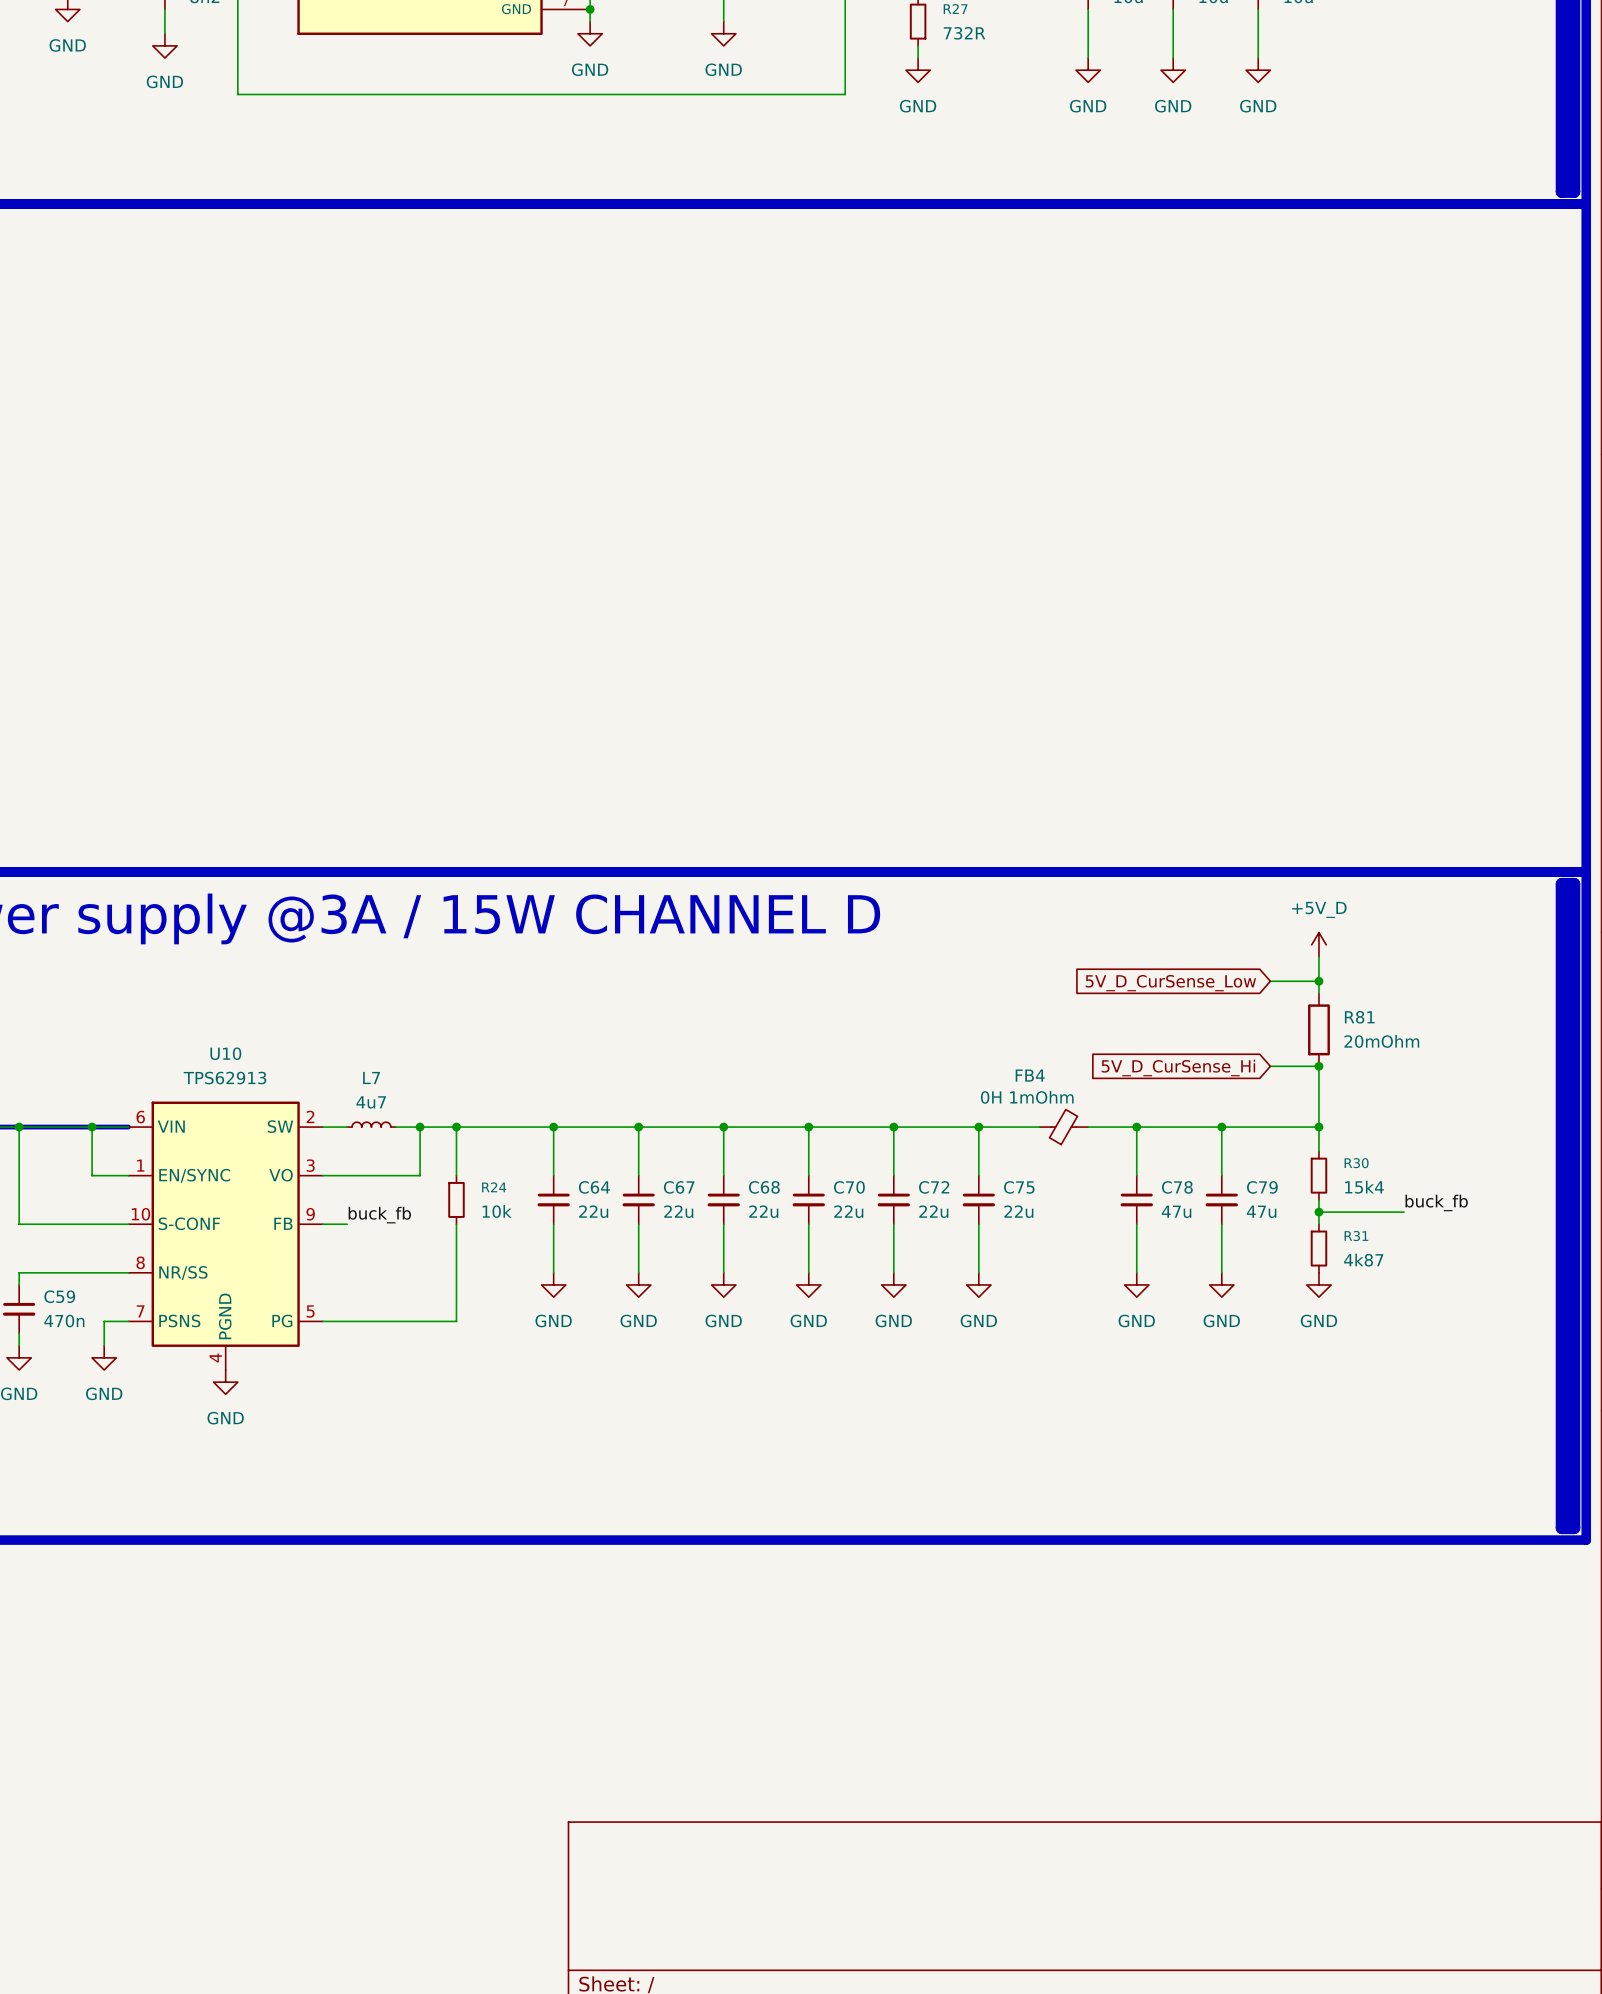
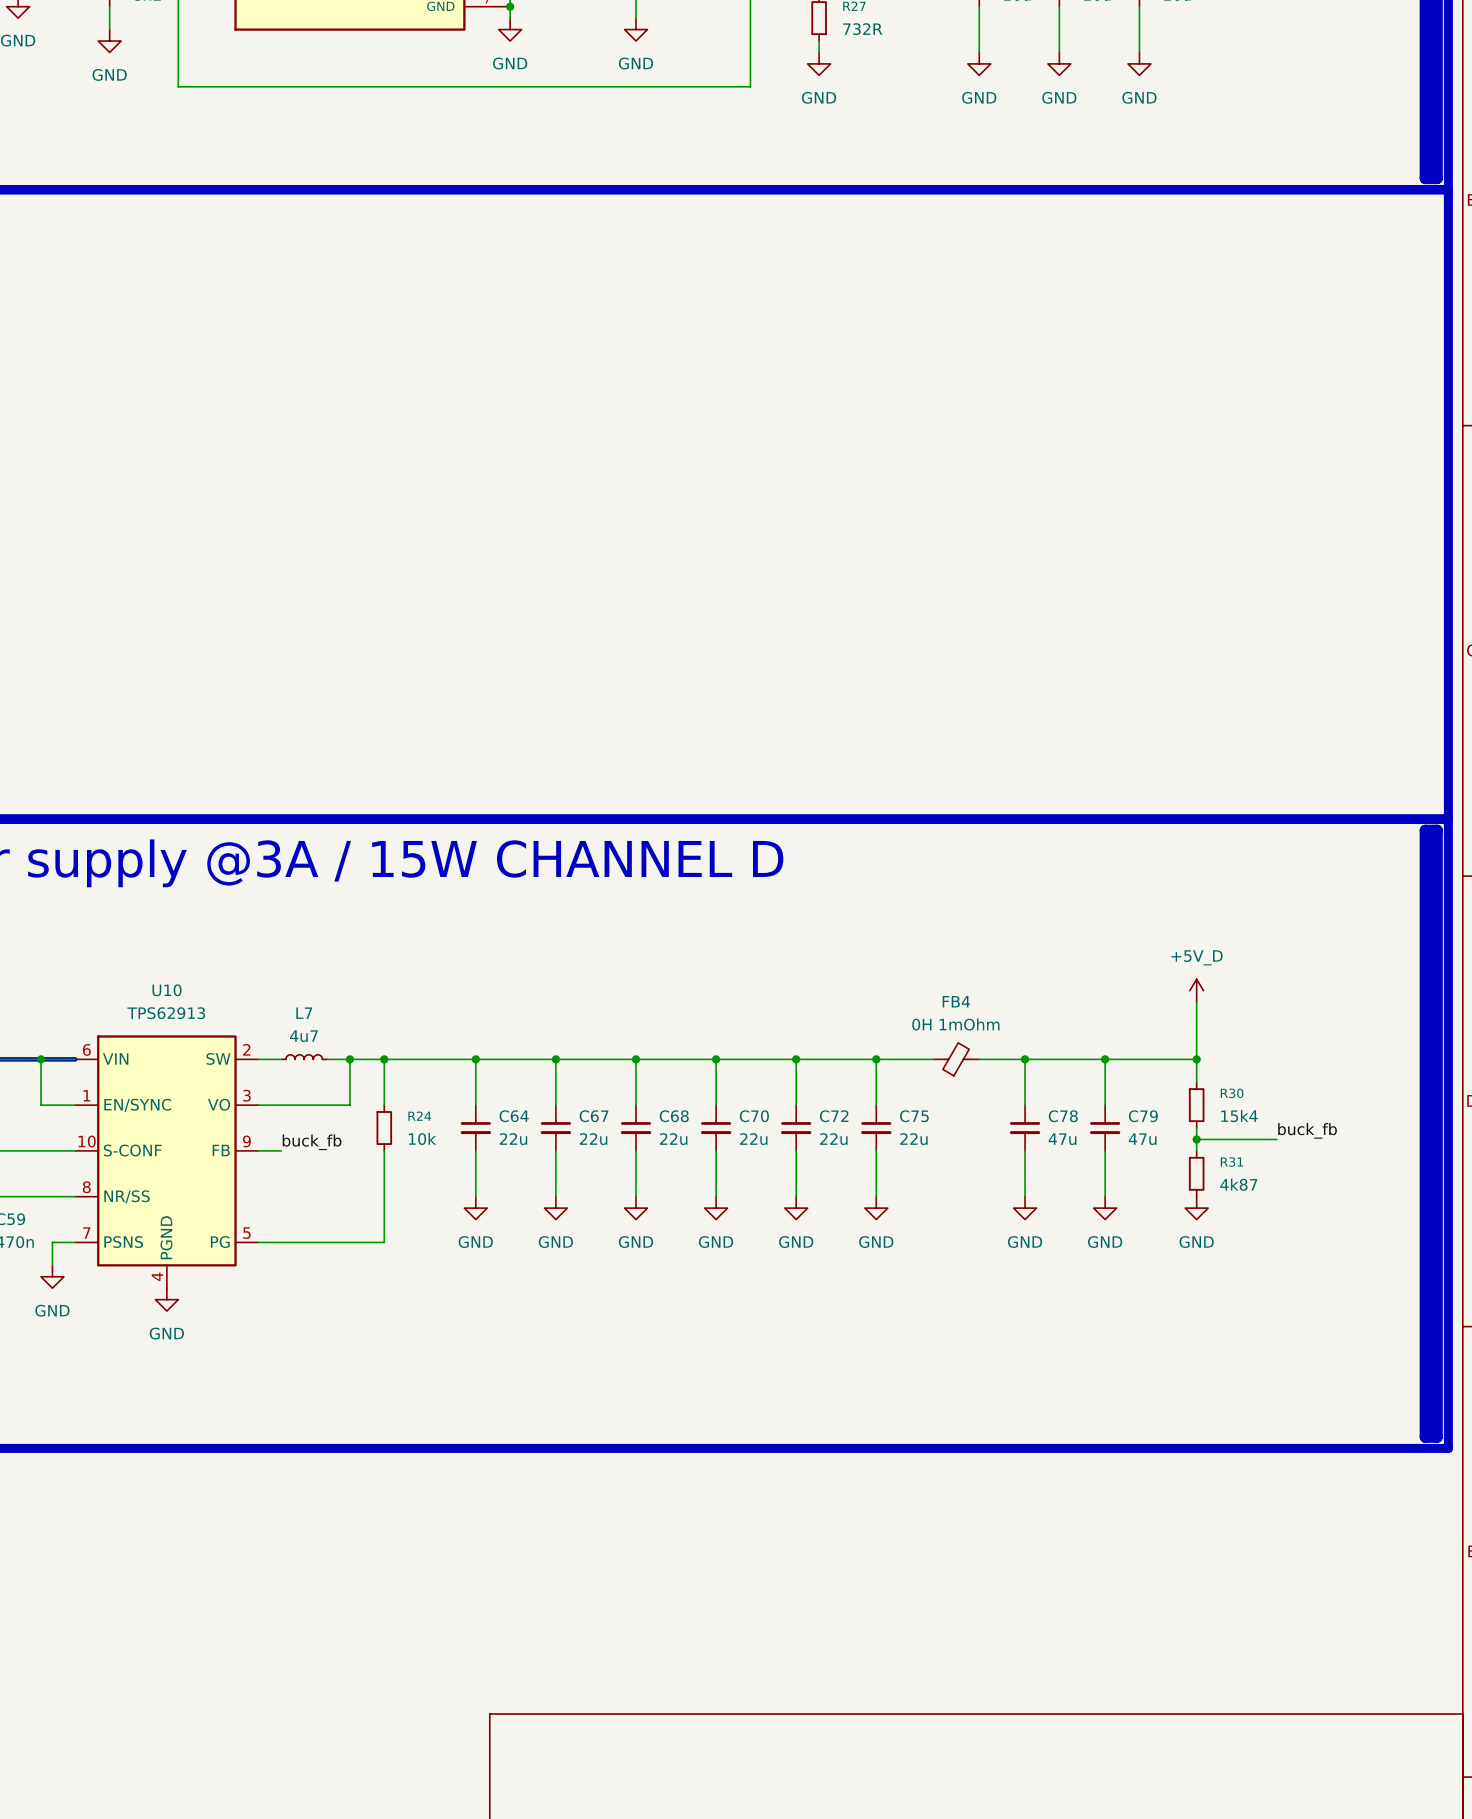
power symbol position: +5V_D (1318, 944) -> +5V_D (1196, 990)
wire: (1318, 956) (1318, 993) -> none
wire: (1270, 981) (1318, 981) -> none
junction: (1318, 981) -> none
global label: 5V_D_CurSense_Low (1170, 983) -> none
R81: 20mOhm (1318, 1029) -> none
wire: (1270, 1066) (1318, 1066) -> none
junction: (1318, 1066) -> none
global label: 5V_D_CurSense_Hi (1178, 1068) -> none
FB4 name position: FB4 (1030, 1075) -> FB4 (956, 1001)
FB4 value position: 0H 1mOhm (1027, 1097) -> 0H 1mOhm (955, 1024)

